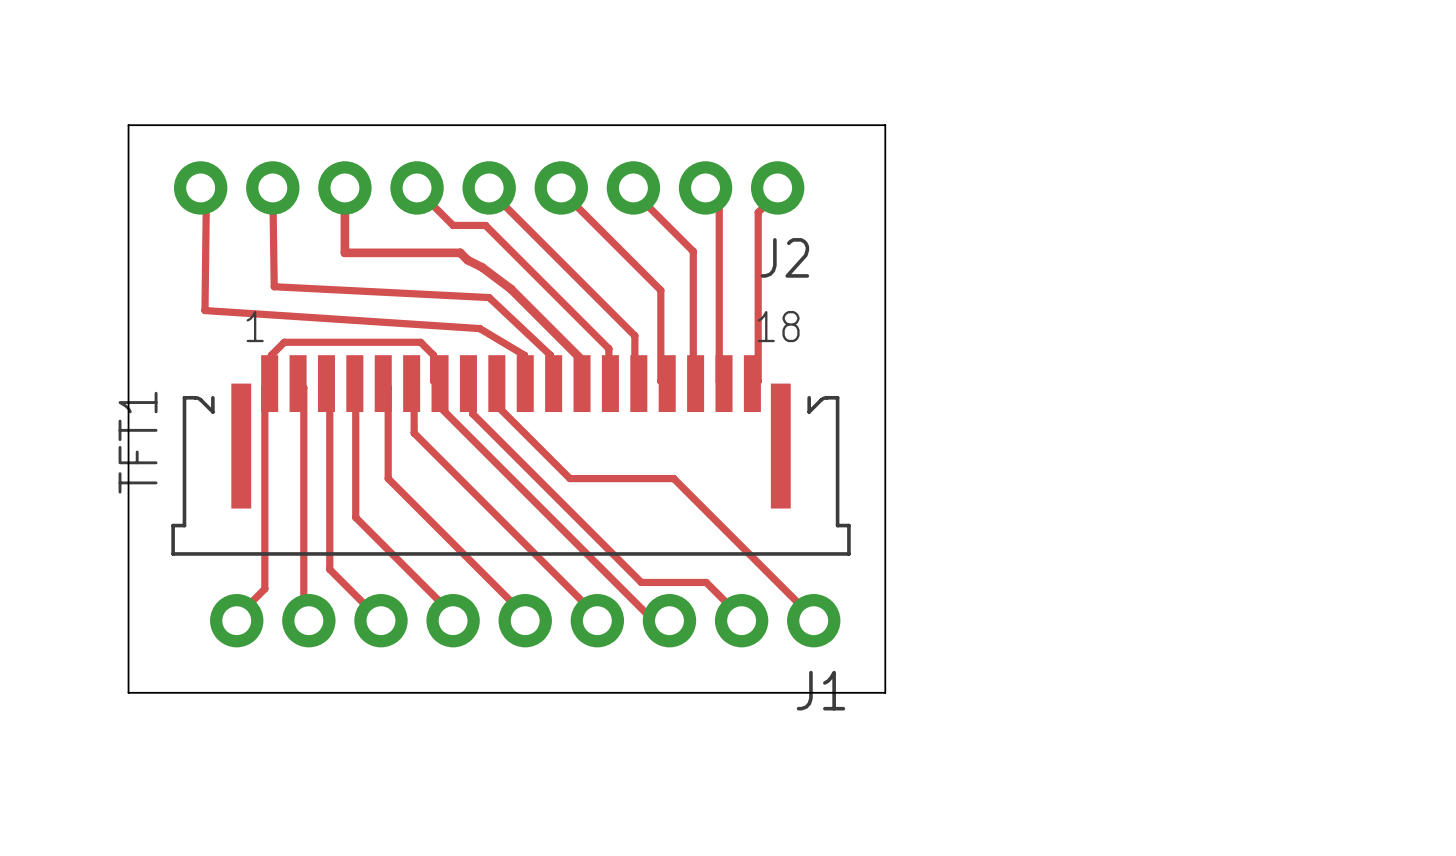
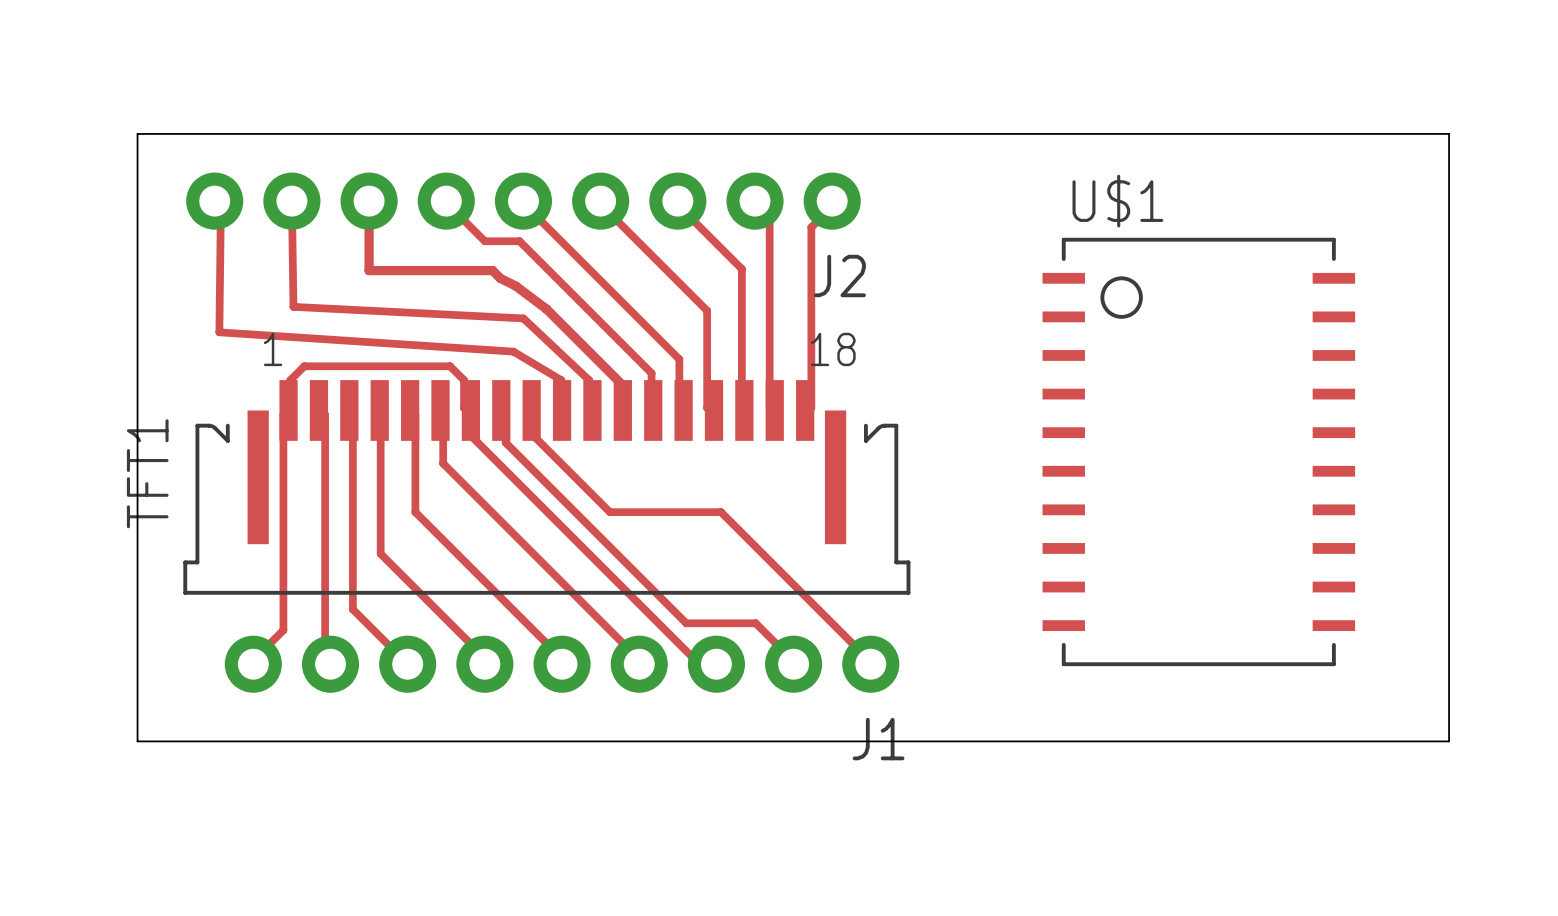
board edge: (885, 125) (885, 692) -> (947, 133) (1449, 133) (1449, 741) (947, 741)
U$1: none -> (1198, 451)

